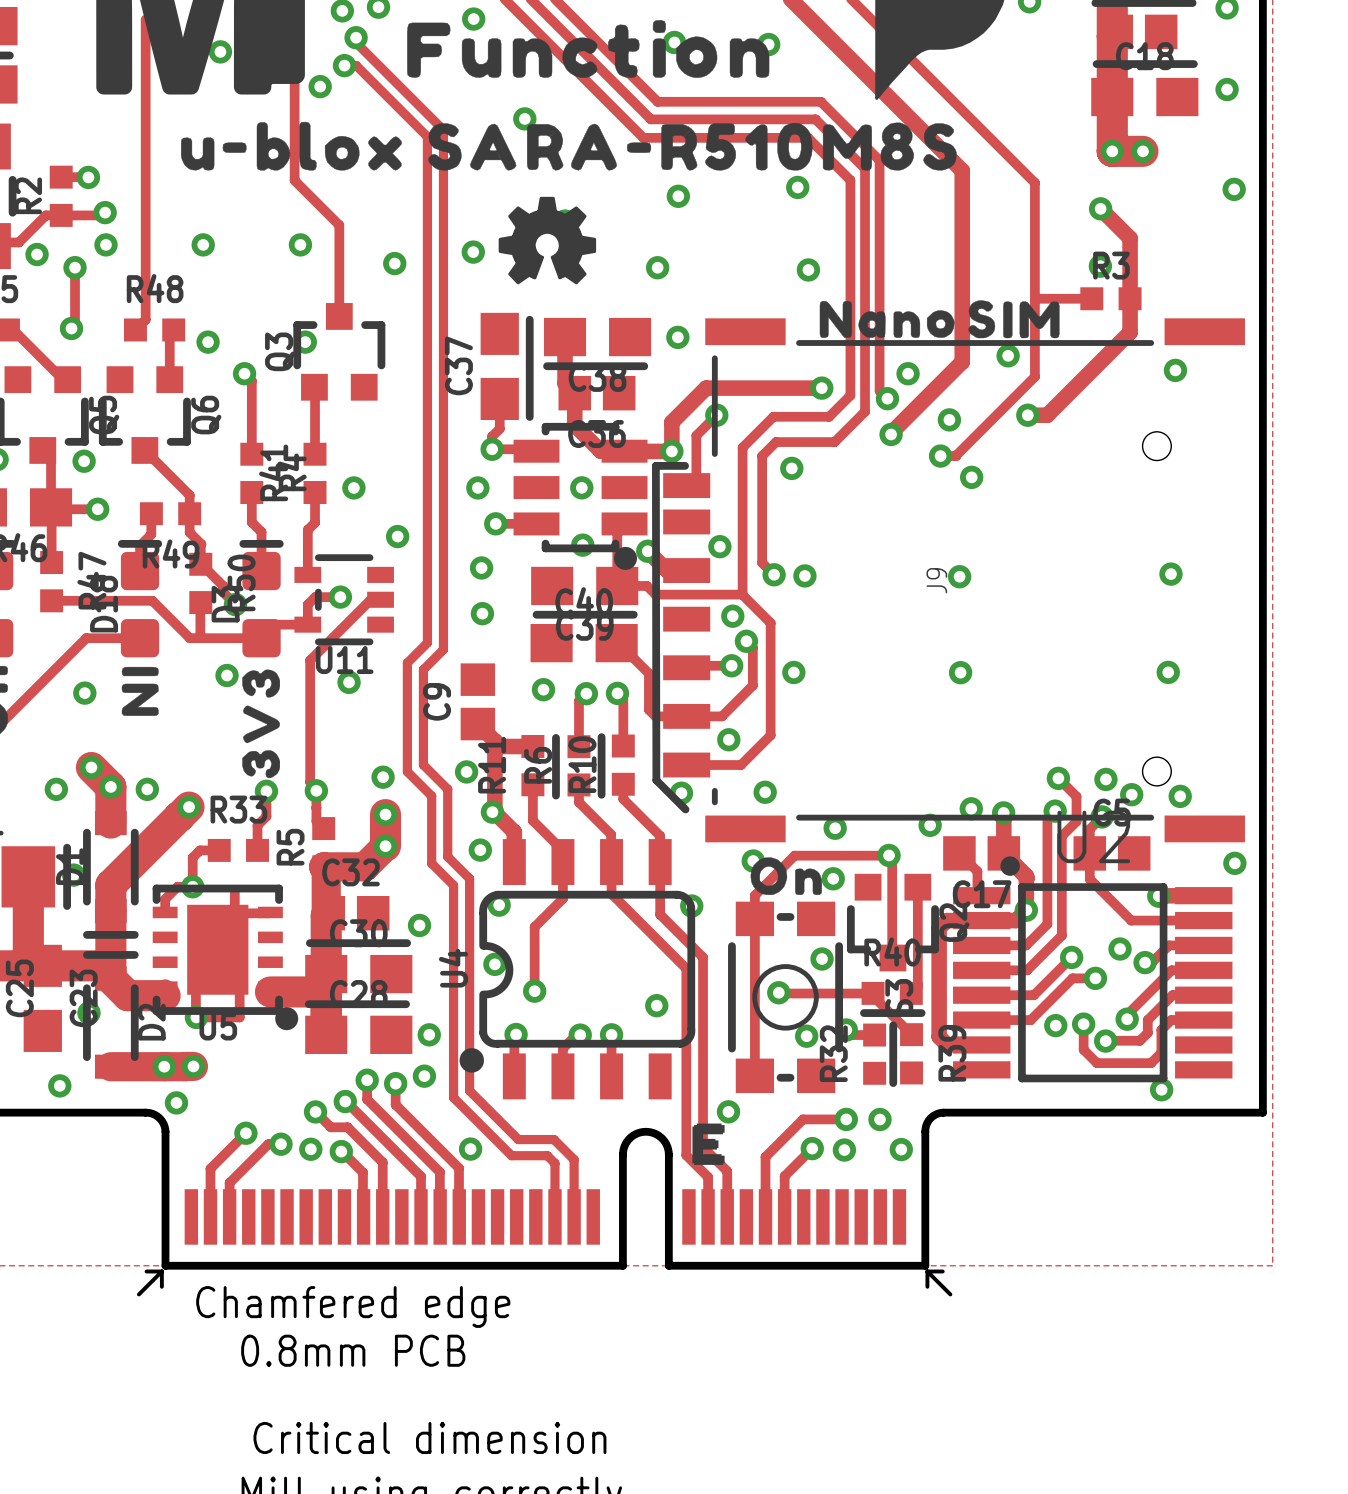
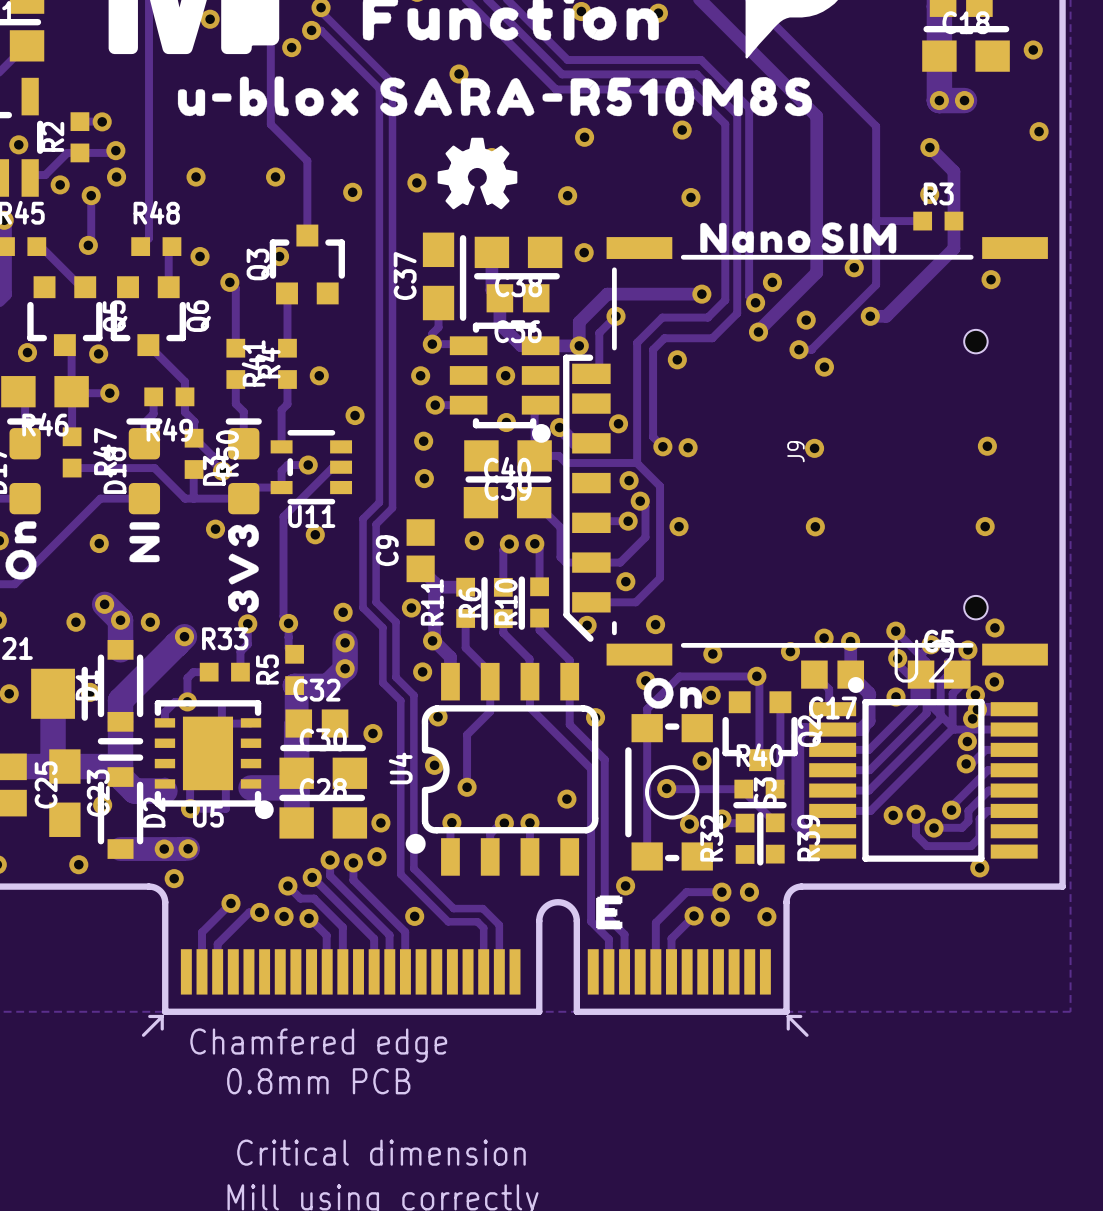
track: (1058, 778) (1076, 796) (1076, 821) (1061, 836) (1061, 935) -> (895, 631) (926, 661) (926, 713) (898, 741)
via: (1058, 778) -> none
via: (1105, 779) -> none
via: (1131, 794) -> none
via: none -> (895, 631)
track: (1055, 811) (1047, 818) (1047, 924) -> (897, 658) (897, 663) (914, 680) (914, 704) (886, 732)
via: (1055, 811) -> none
via: none -> (967, 649)
via: none -> (897, 658)
via: none -> (994, 681)
via: (1234, 863) -> none
via: none -> (975, 694)
via: none -> (896, 696)
via: none -> (972, 718)
via: (1026, 910) -> none
via: none -> (967, 741)
via: (1120, 948) -> none
track: (1071, 957) (1033, 995) (1026, 995) -> (947, 661) (947, 675) (940, 682) (940, 718) (869, 790)
via: (1071, 957) -> none
track: (1095, 978) (1072, 978) (1030, 1020) (1028, 1020) -> (967, 649) (965, 652) (965, 680) (952, 693) (952, 728) (870, 810)
via: (1095, 978) -> none

